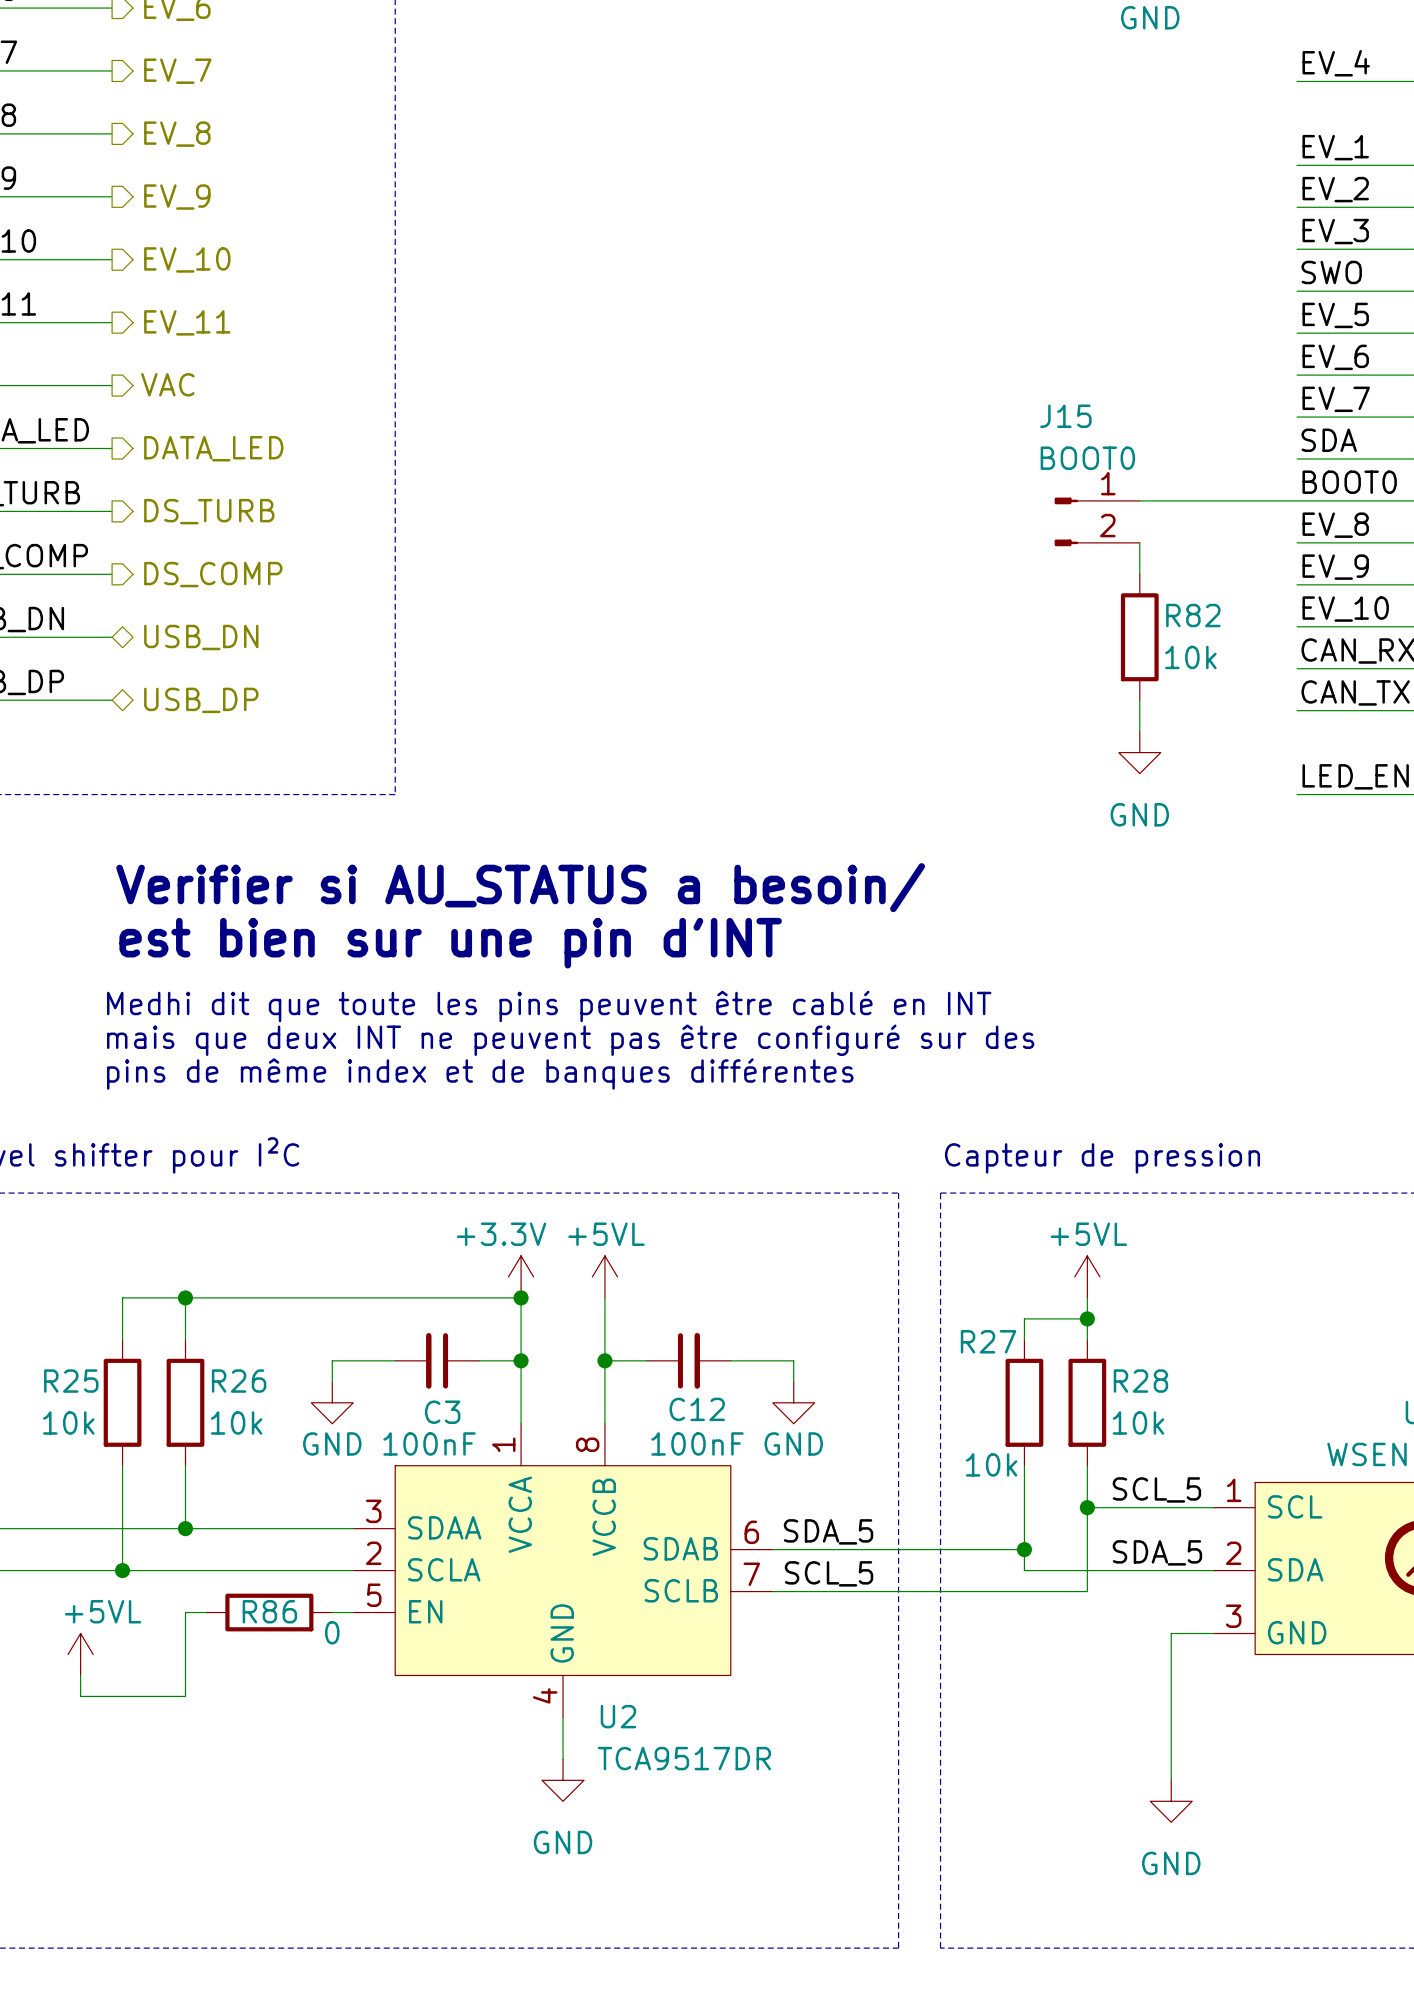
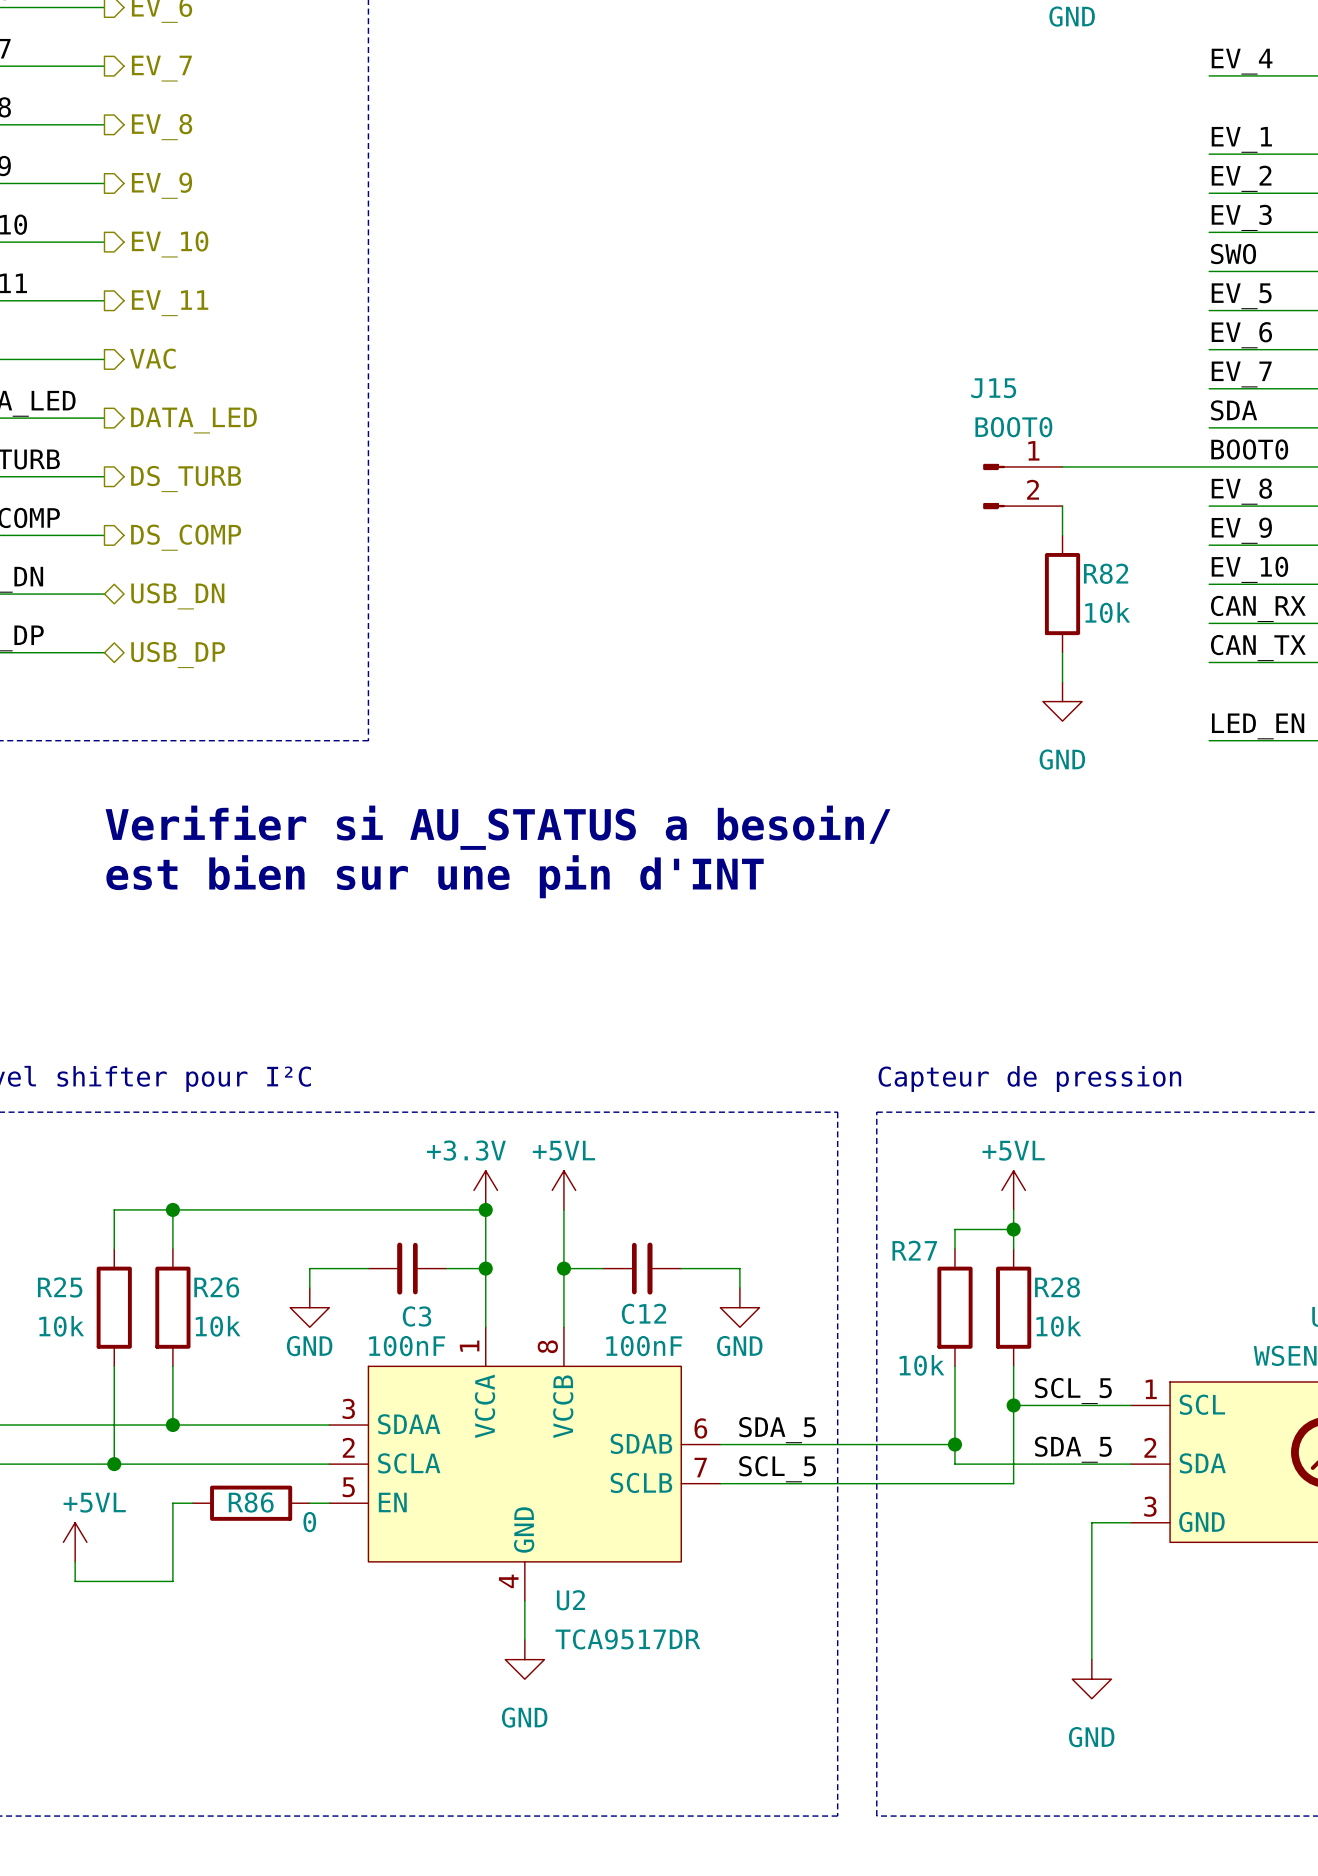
text: Medhi dit que toute les pins peuvent être cablé en INT (549, 1006) -> none
text: mais que deux INT ne peuvent pas être configuré sur des (570, 1040) -> none
text: pins de même index et de banques différentes (480, 1074) -> none

